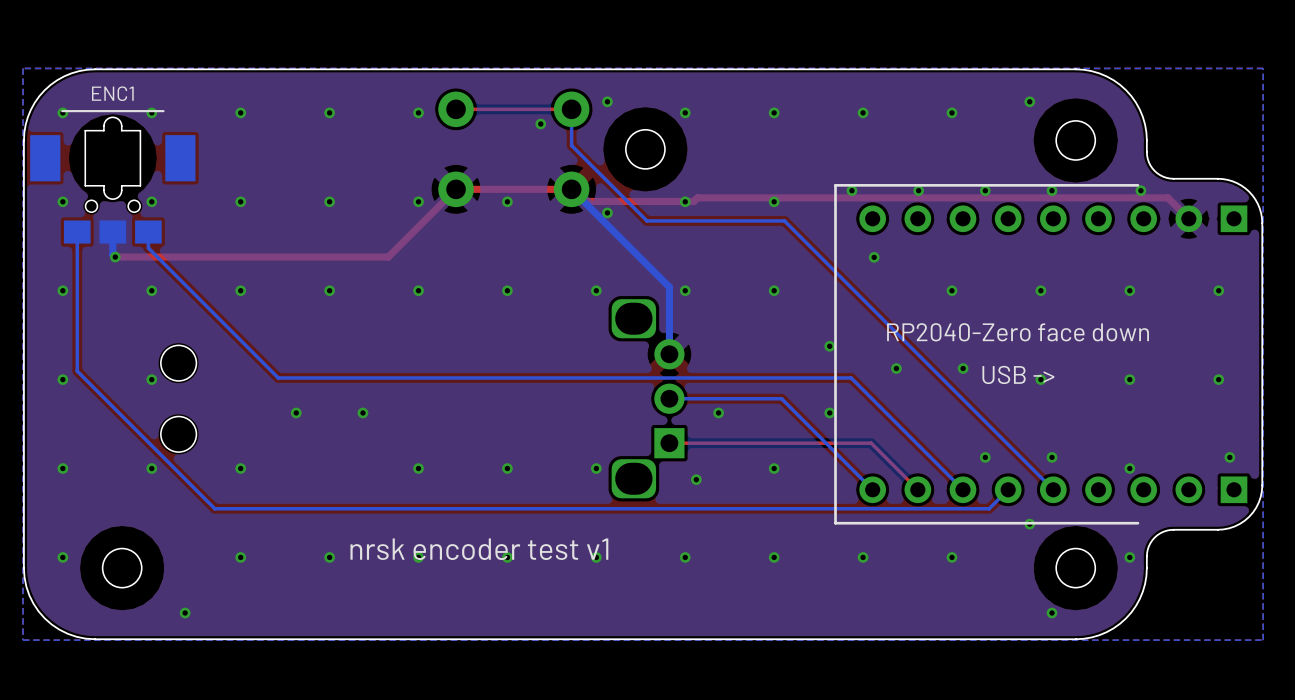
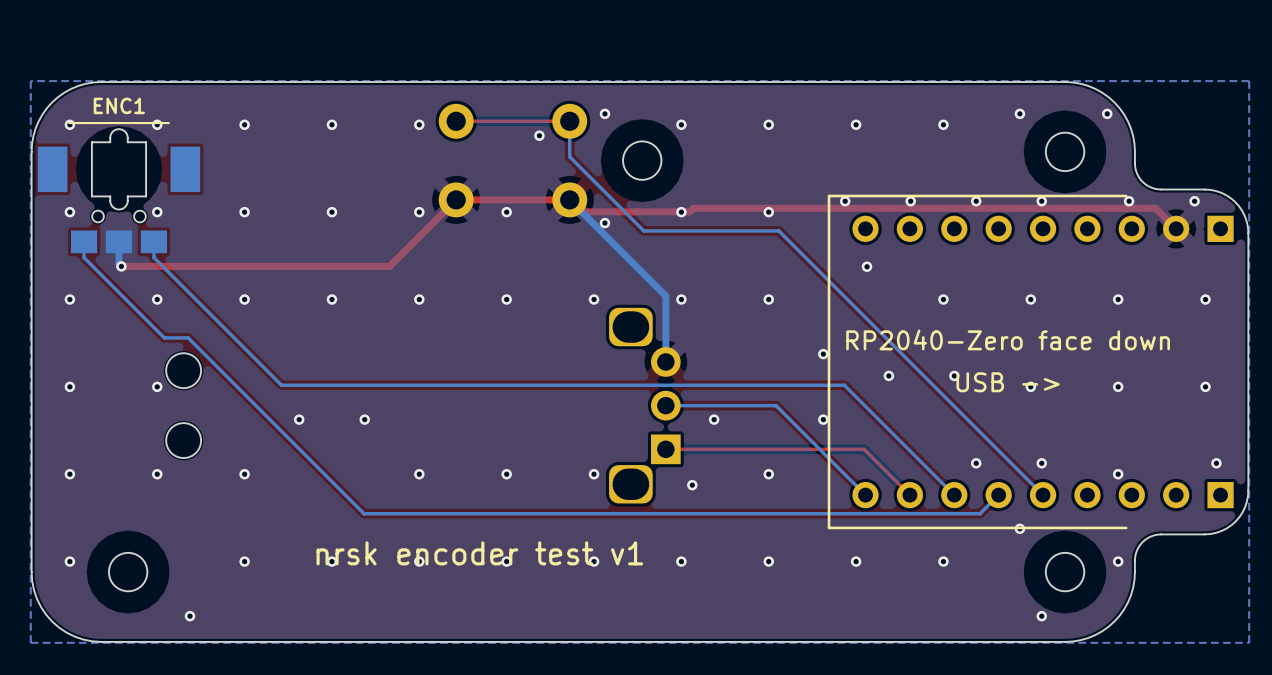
via: none -> (1107, 113)
via: none -> (1194, 201)
bottom track: (77, 248) (77, 371) (214, 508) (362, 508) -> (84, 257) (164, 337) (188, 337) (364, 513)

